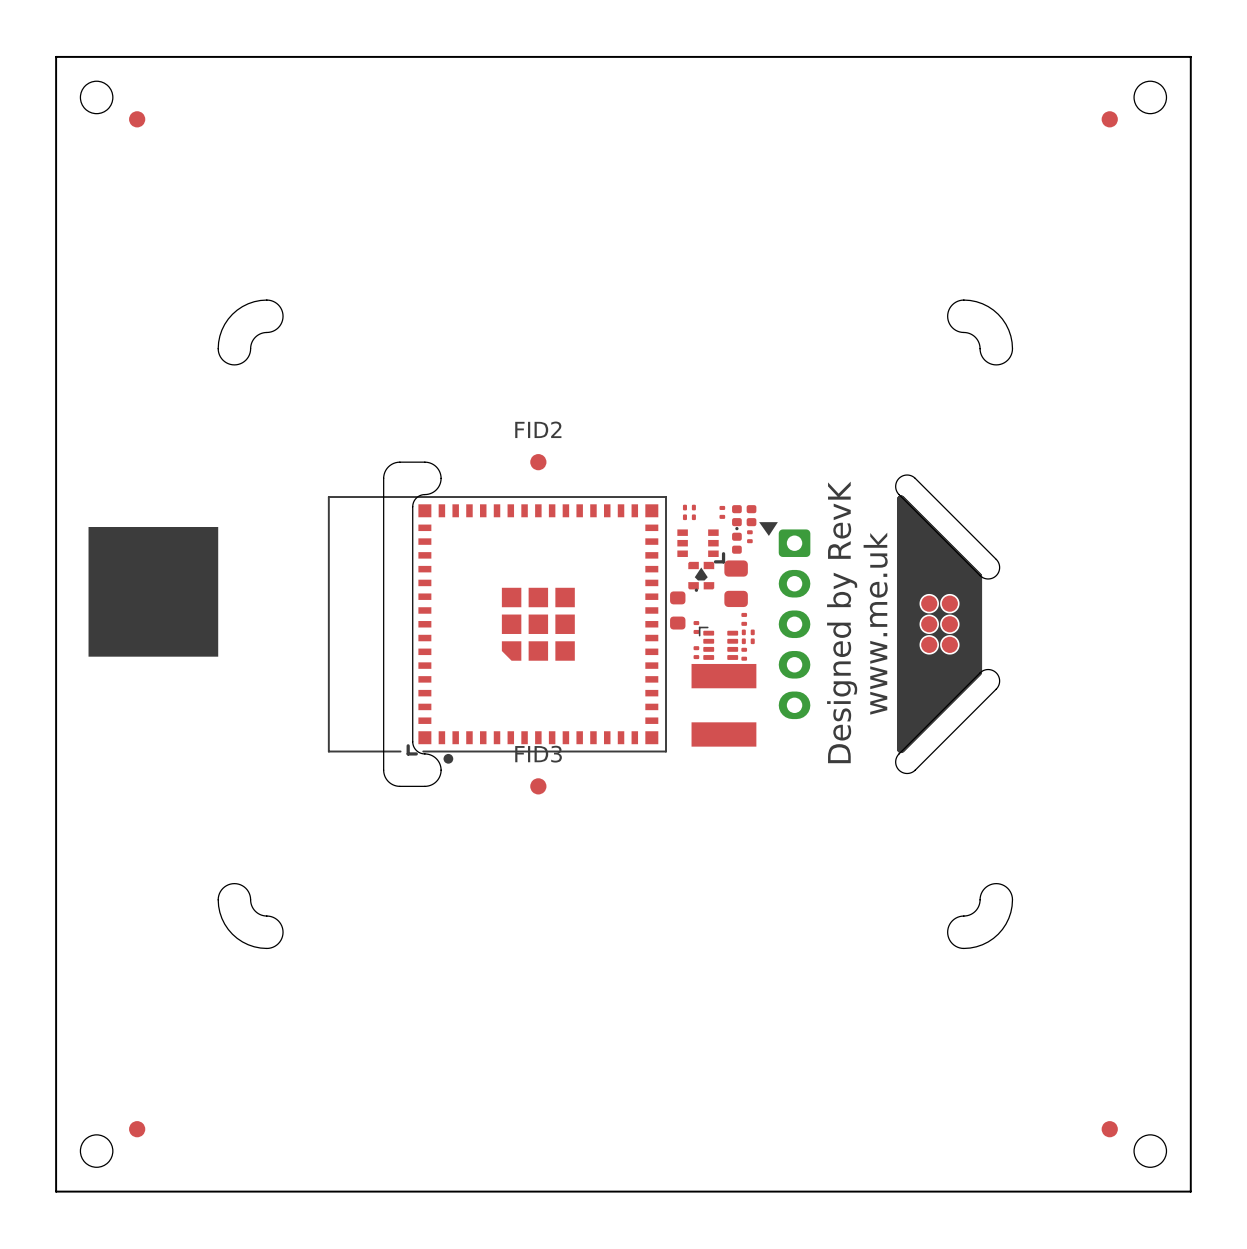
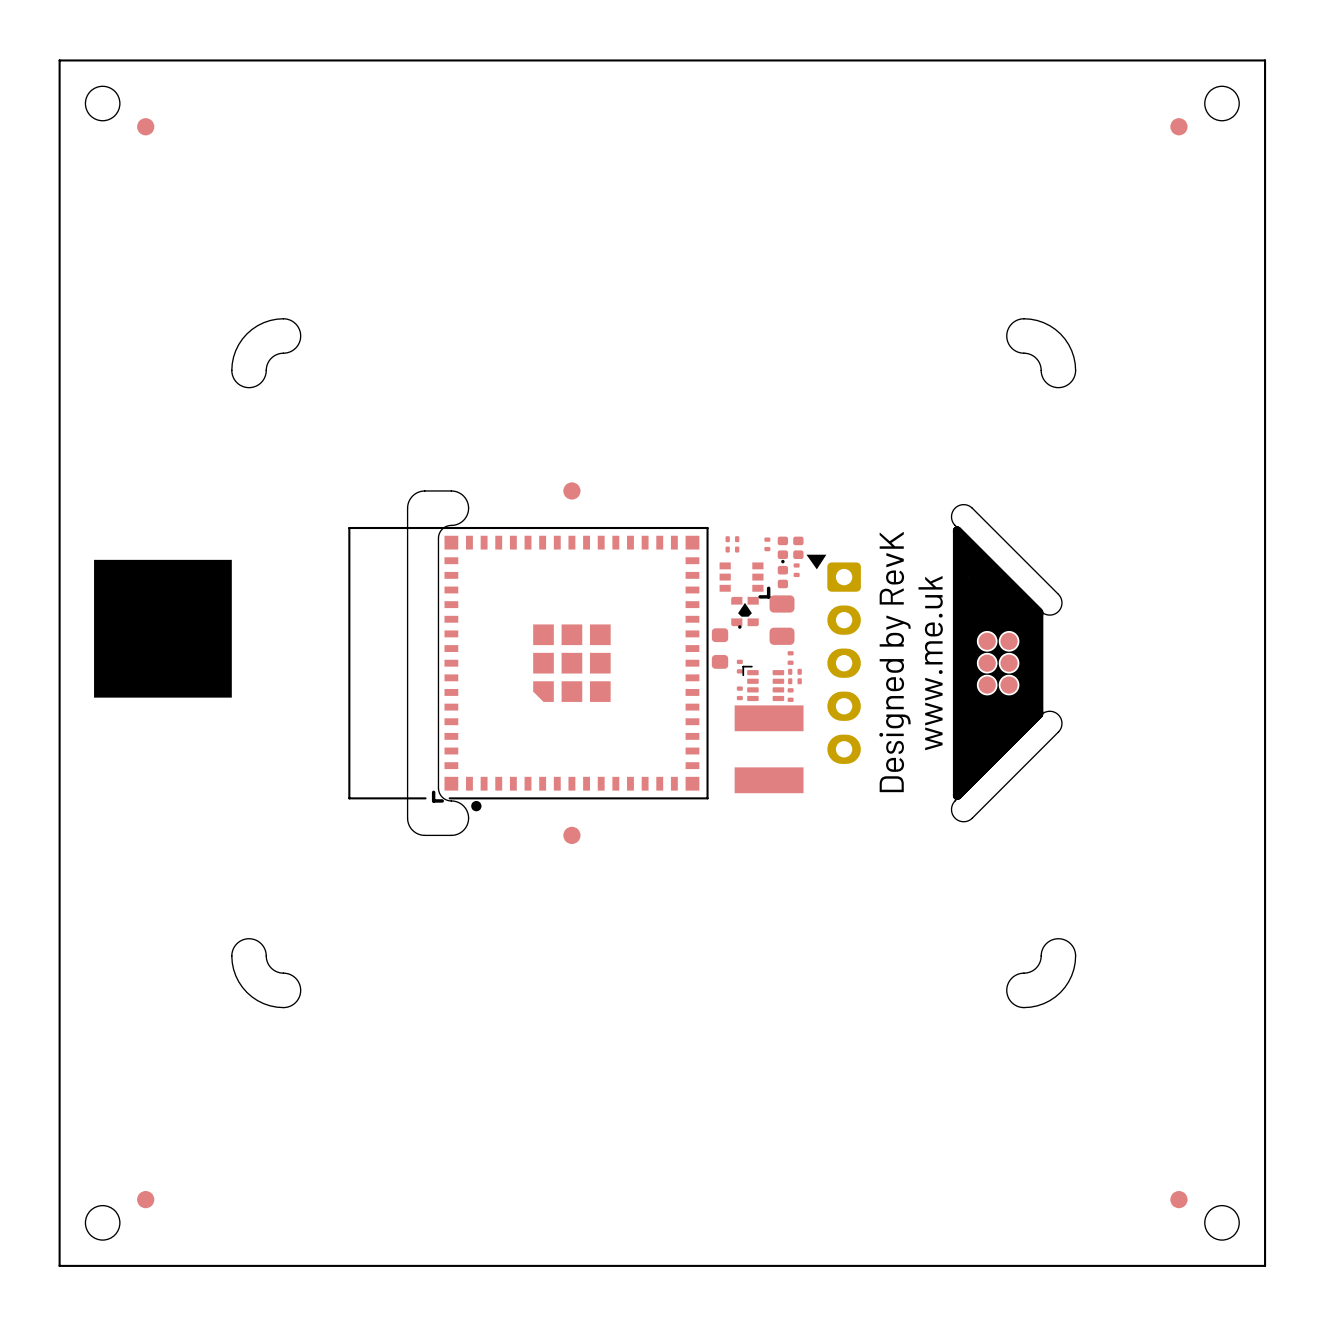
FID2 name: FID2 (538, 429) -> none
FID3 name: FID3 (538, 754) -> none

